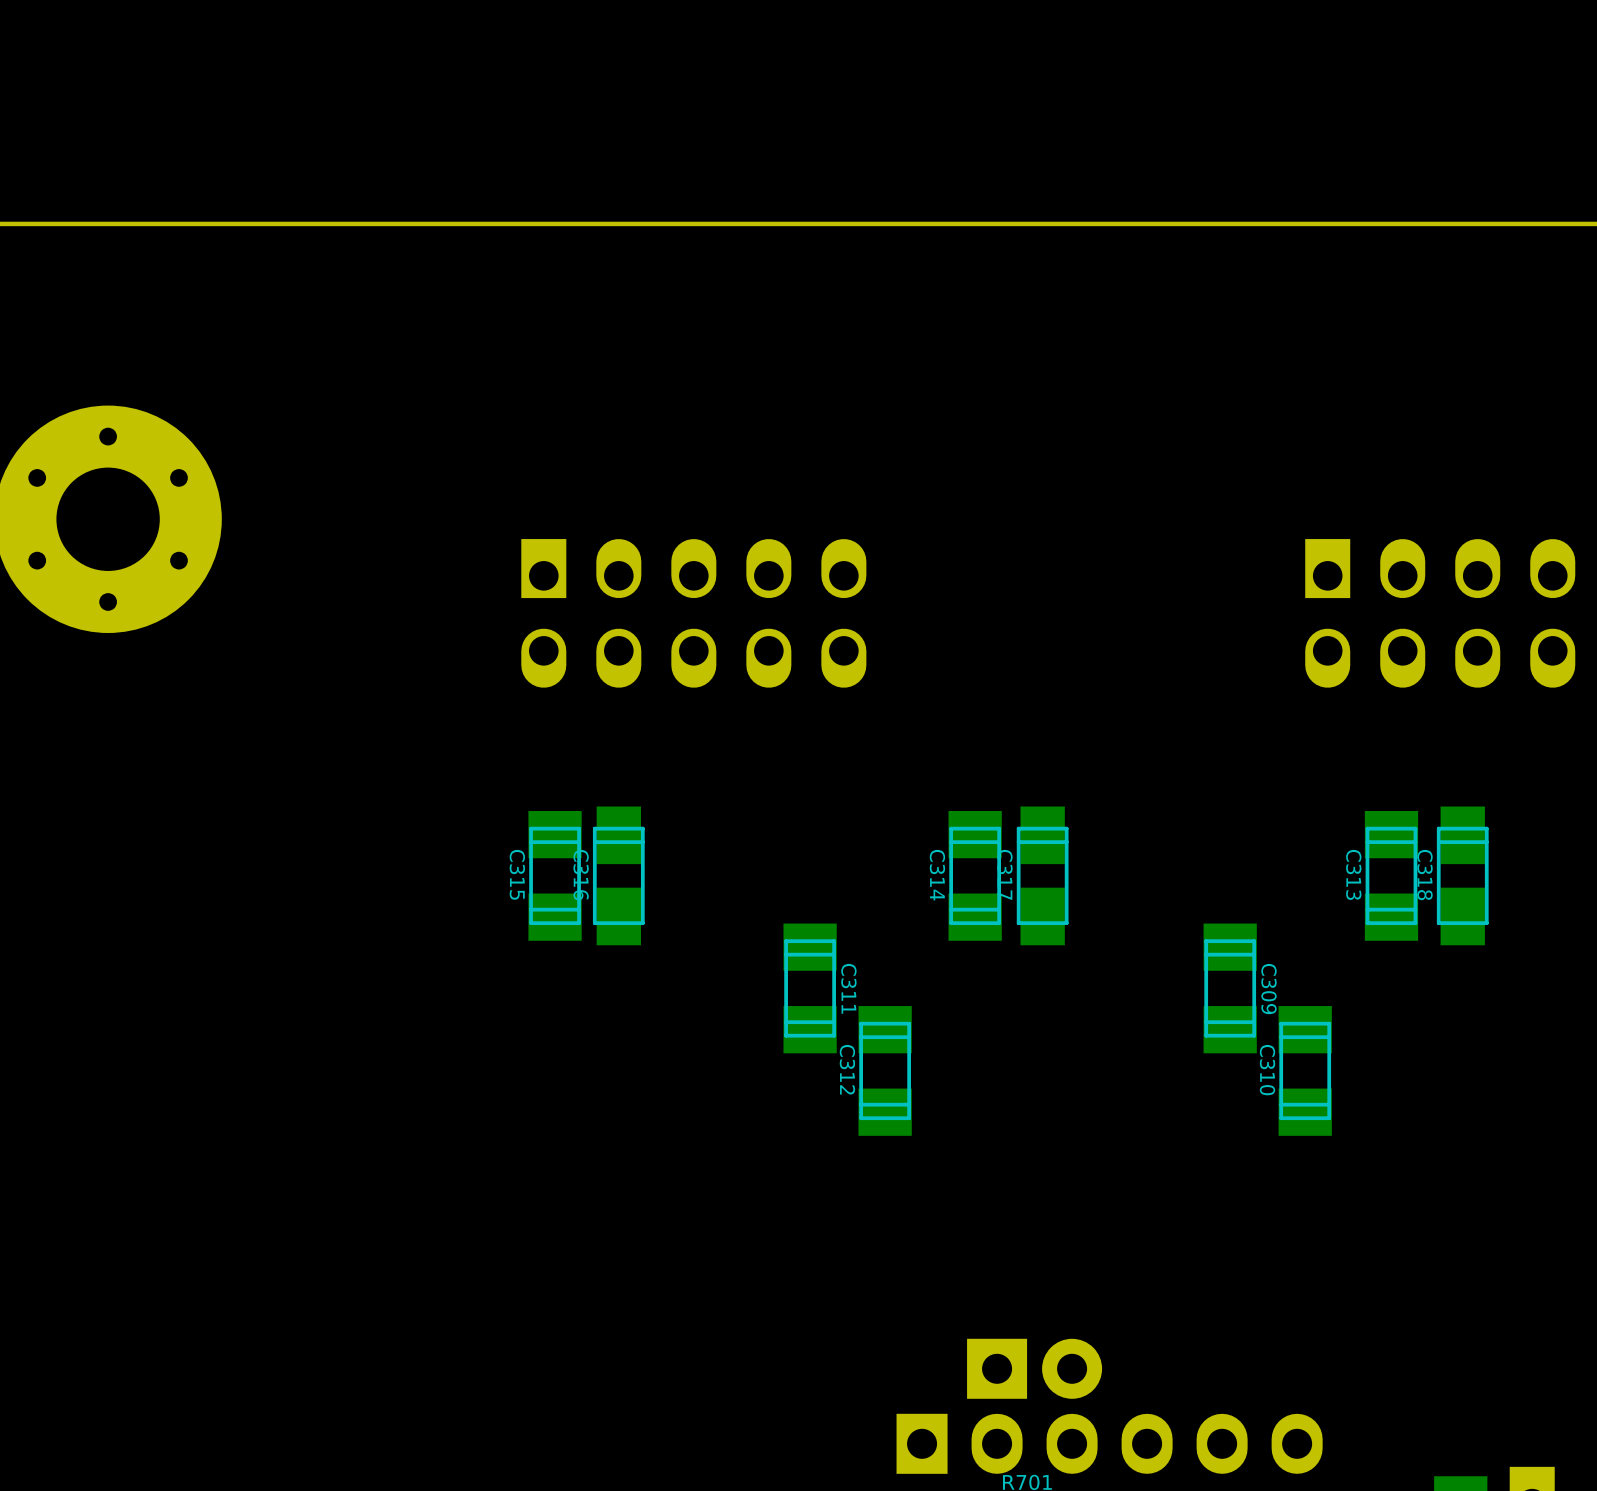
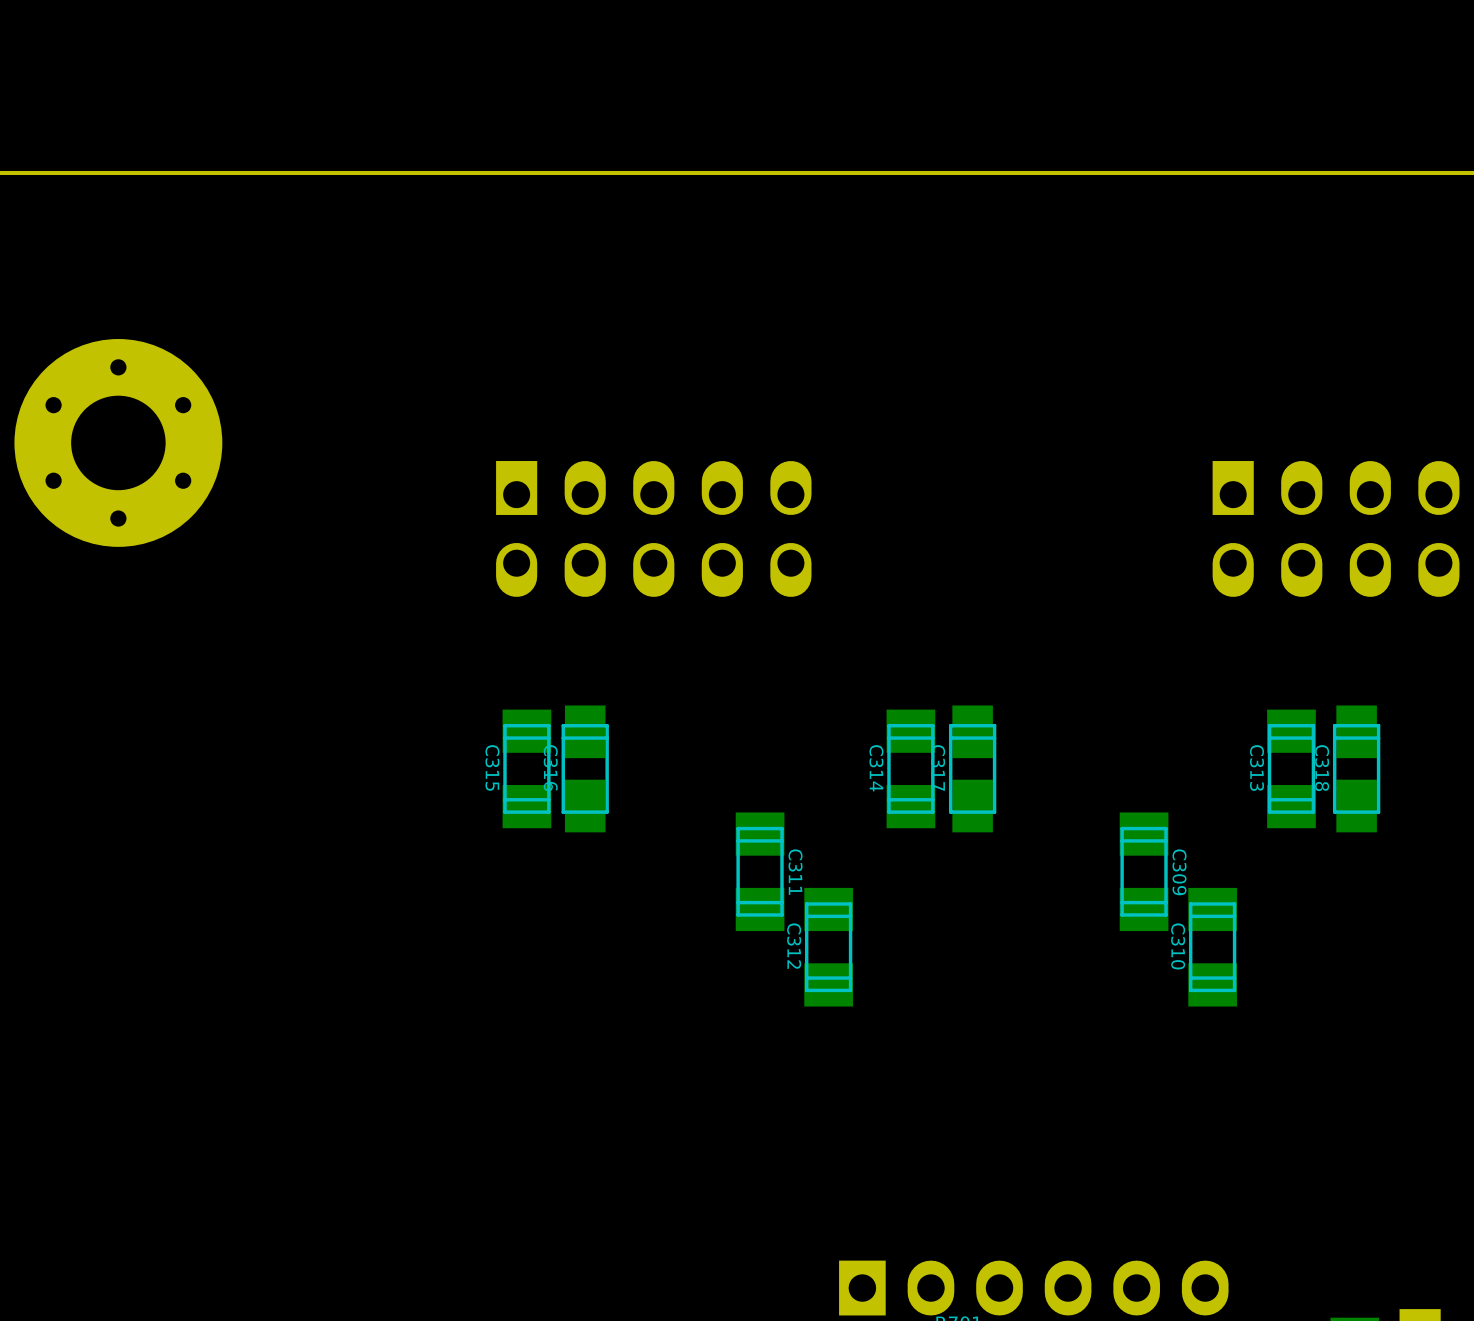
part: (1034, 1368) -> none

